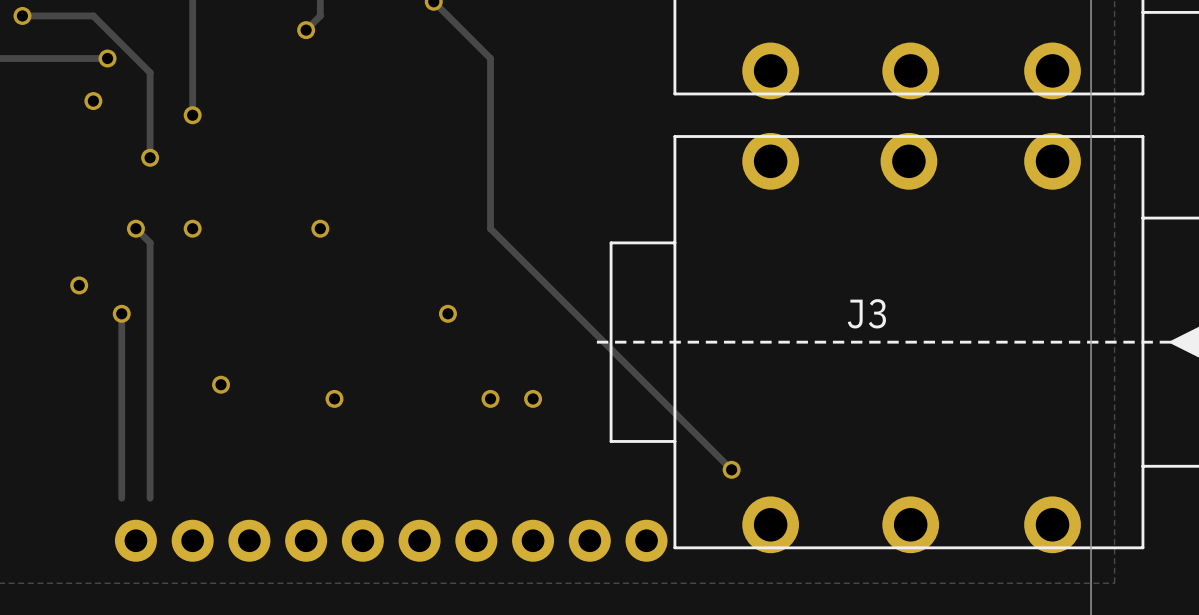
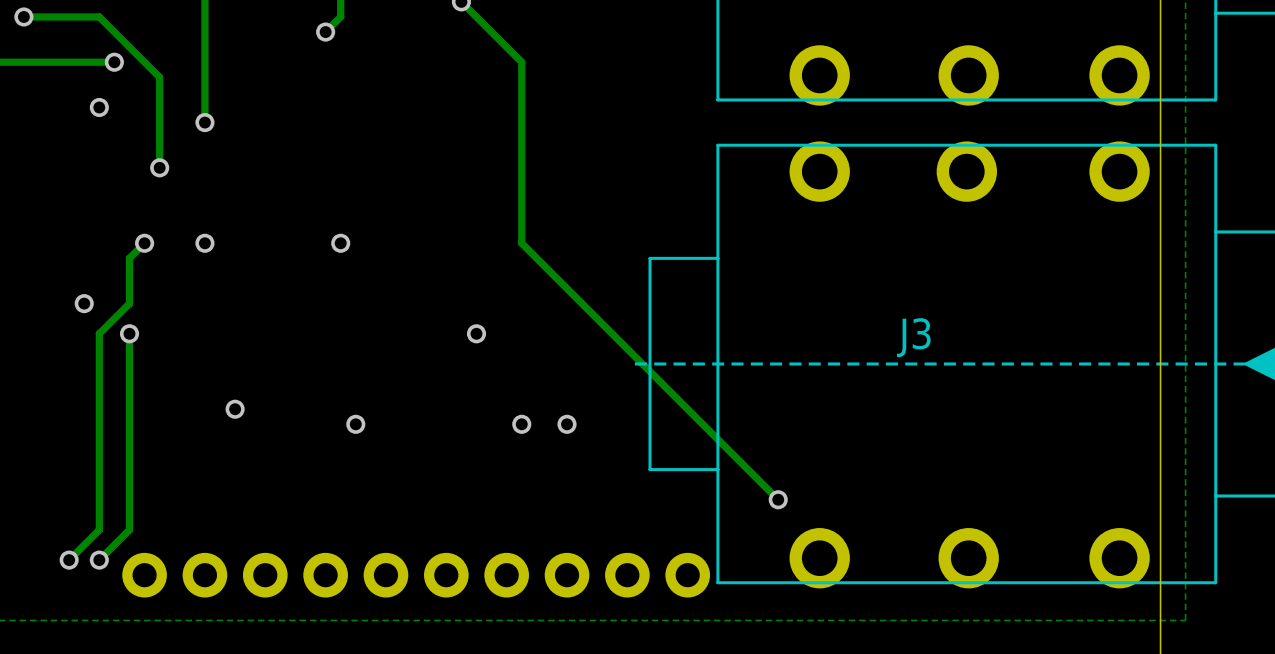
track: (135, 228) (150, 242) (150, 498) -> (144, 243) (129, 258) (129, 303) (99, 333) (99, 529) (69, 560)
track: none -> (129, 529) (99, 560)
via: none -> (69, 560)
via: none -> (99, 560)

